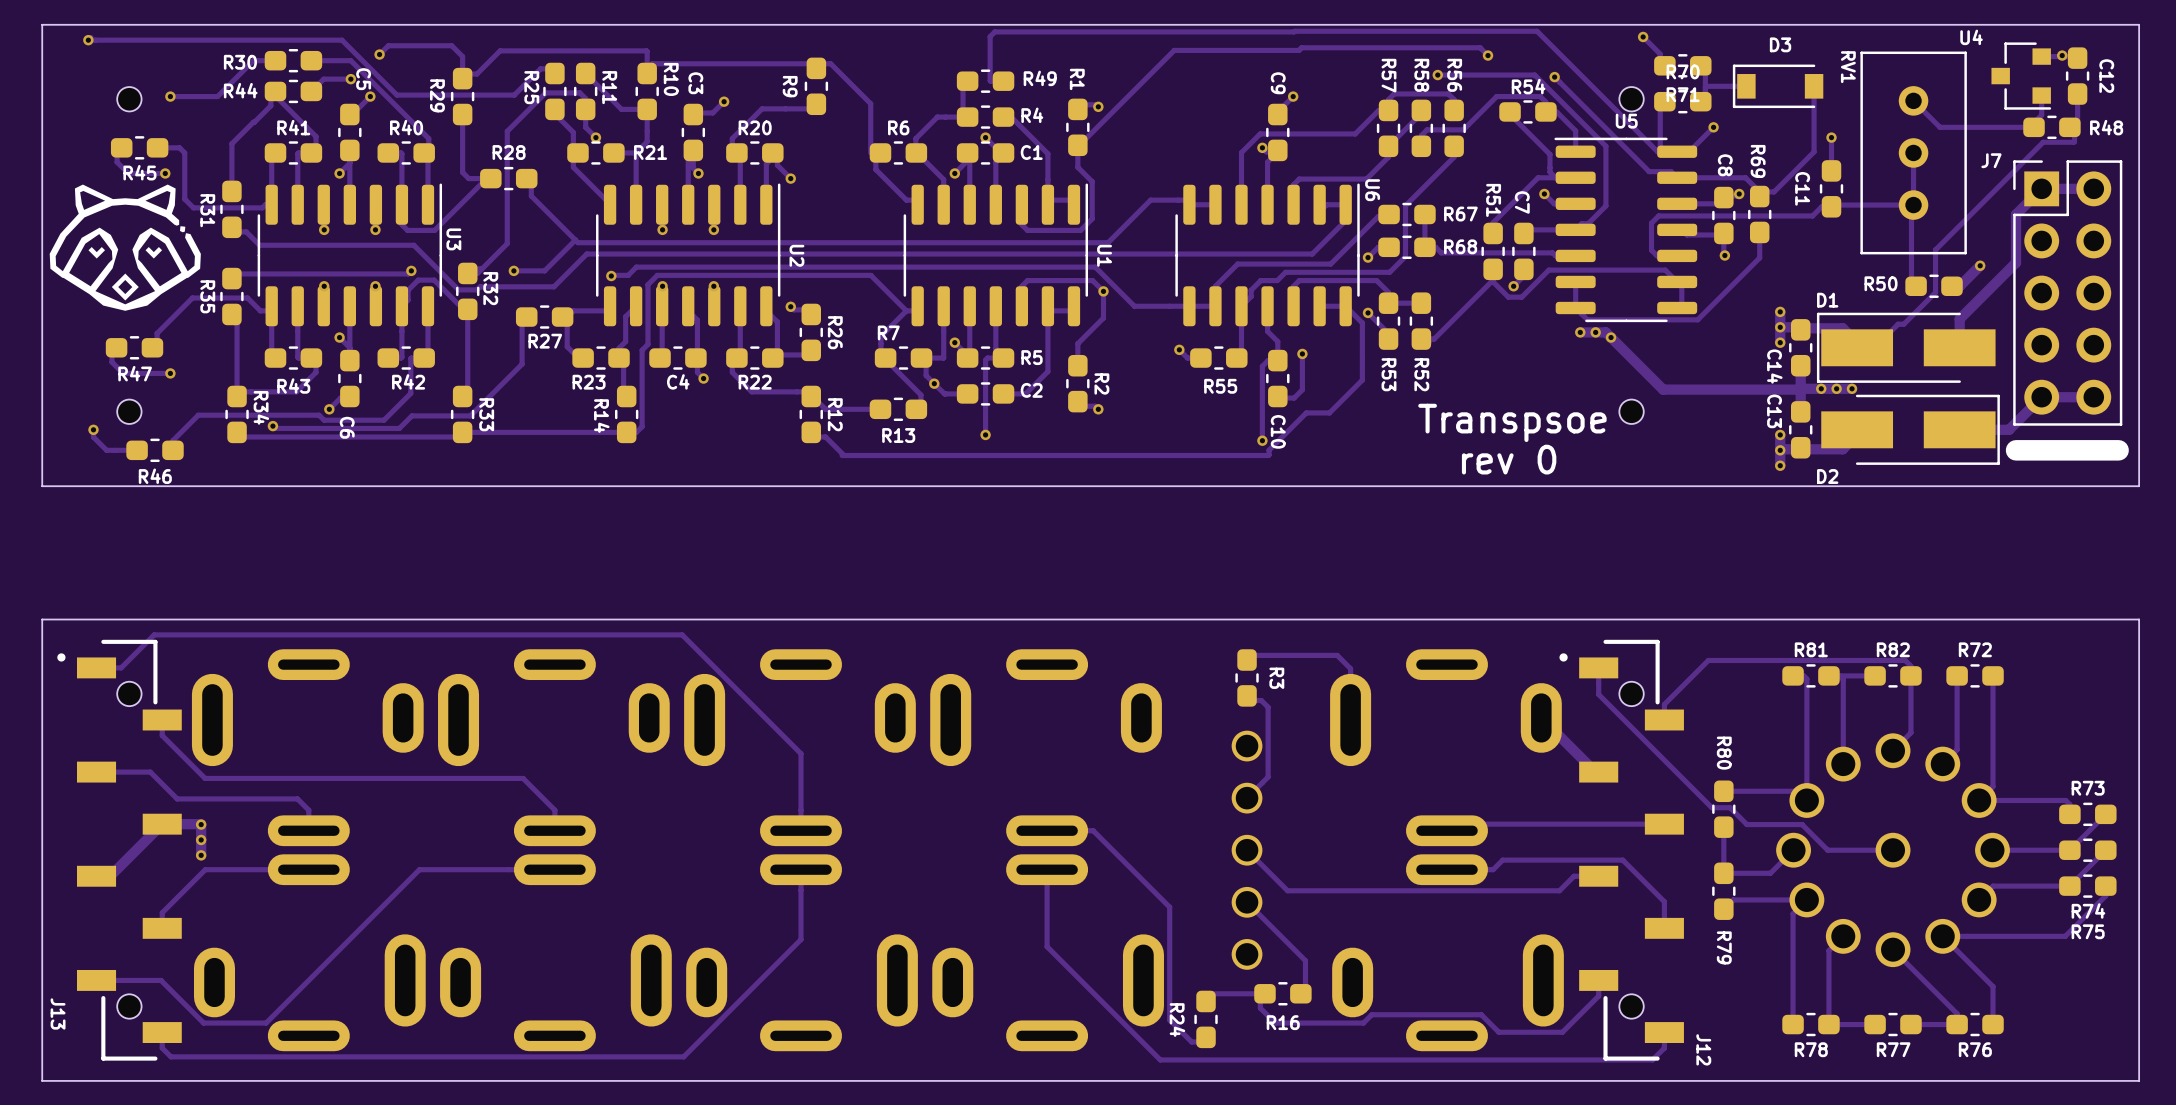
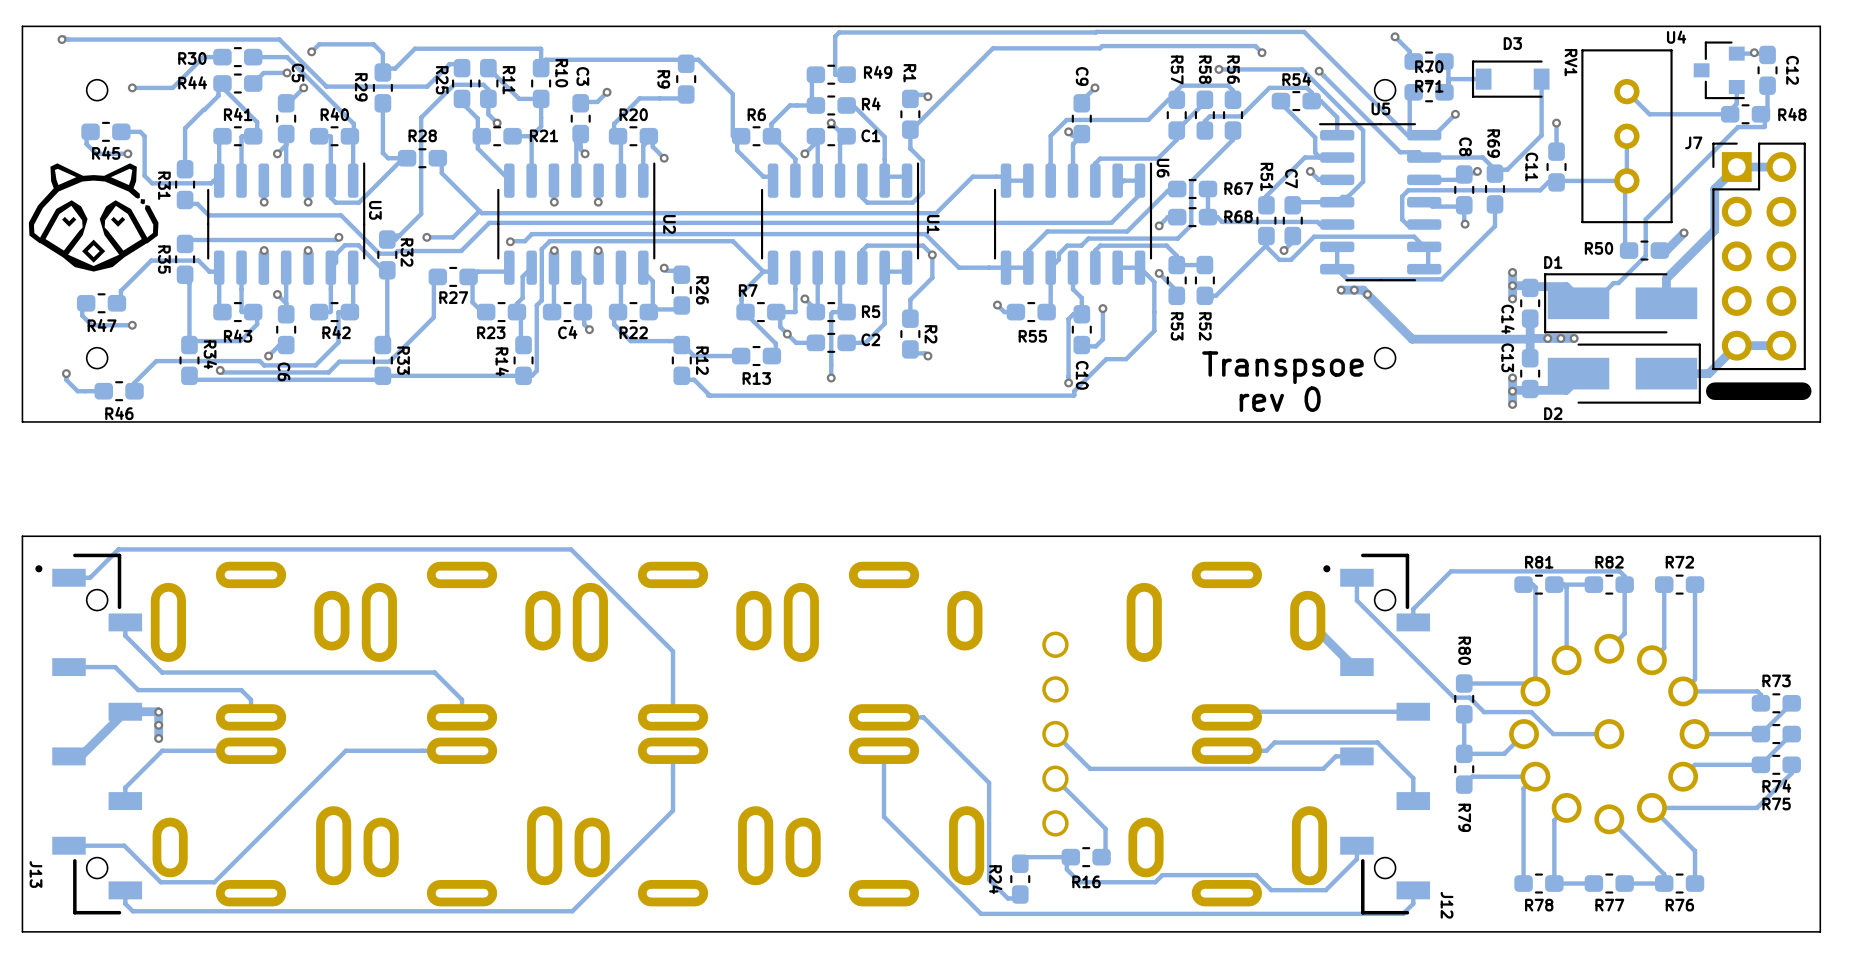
track: (1247, 655) (1337, 655) (1350, 668) (1350, 720) -> none
R3: (1247, 677) -> none
track: (1247, 700) (1261, 700) (1268, 707) (1268, 777) (1247, 798) -> none

